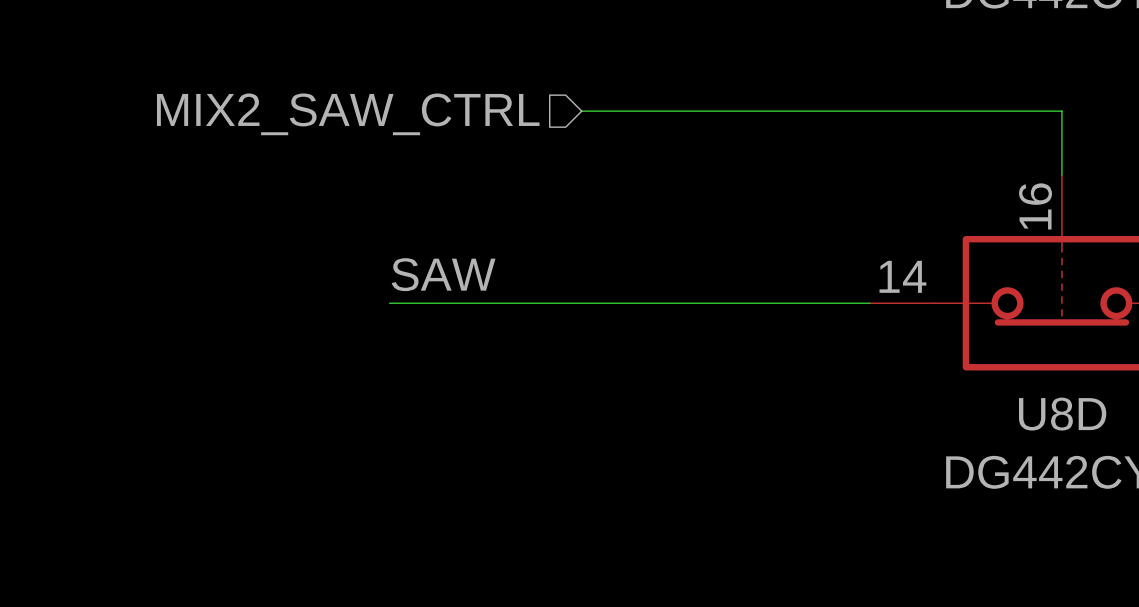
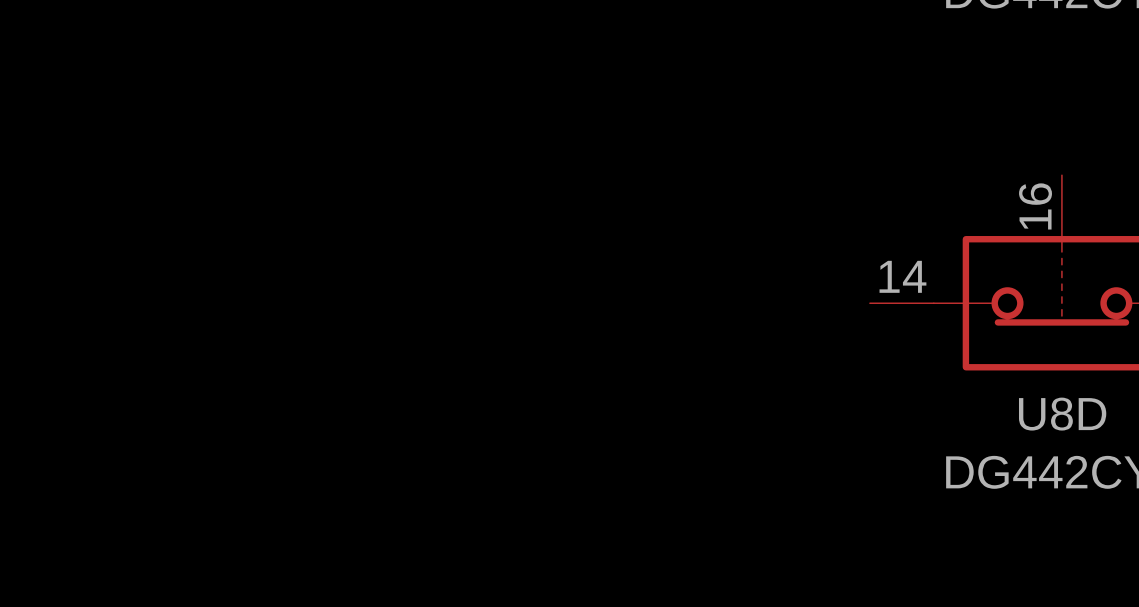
wire: (581, 111) (1061, 111) (1061, 175) -> none
hierarchical label: MIX2_SAW_CTRL (348, 114) -> none
label: SAW (443, 274) -> none
wire: (389, 303) (869, 303) -> none

